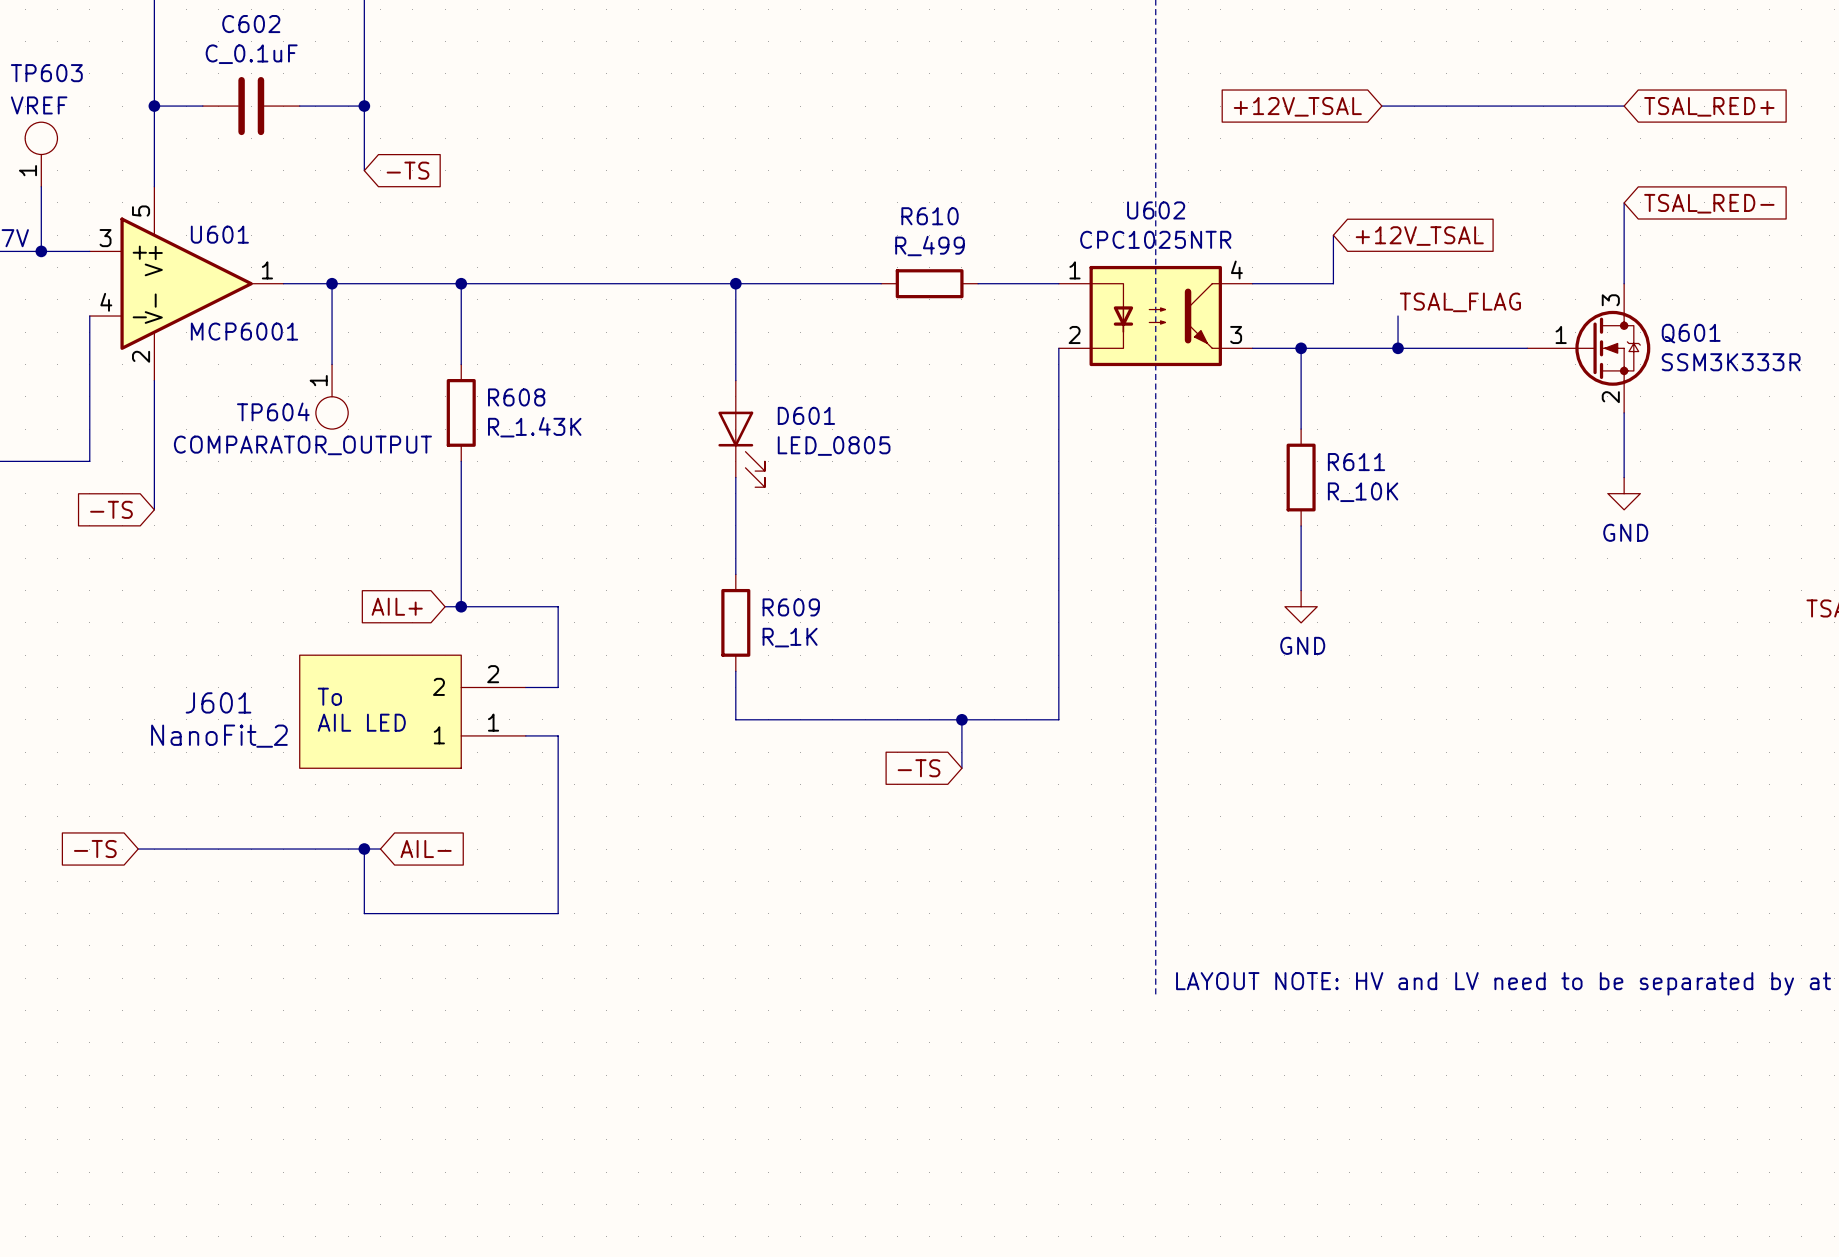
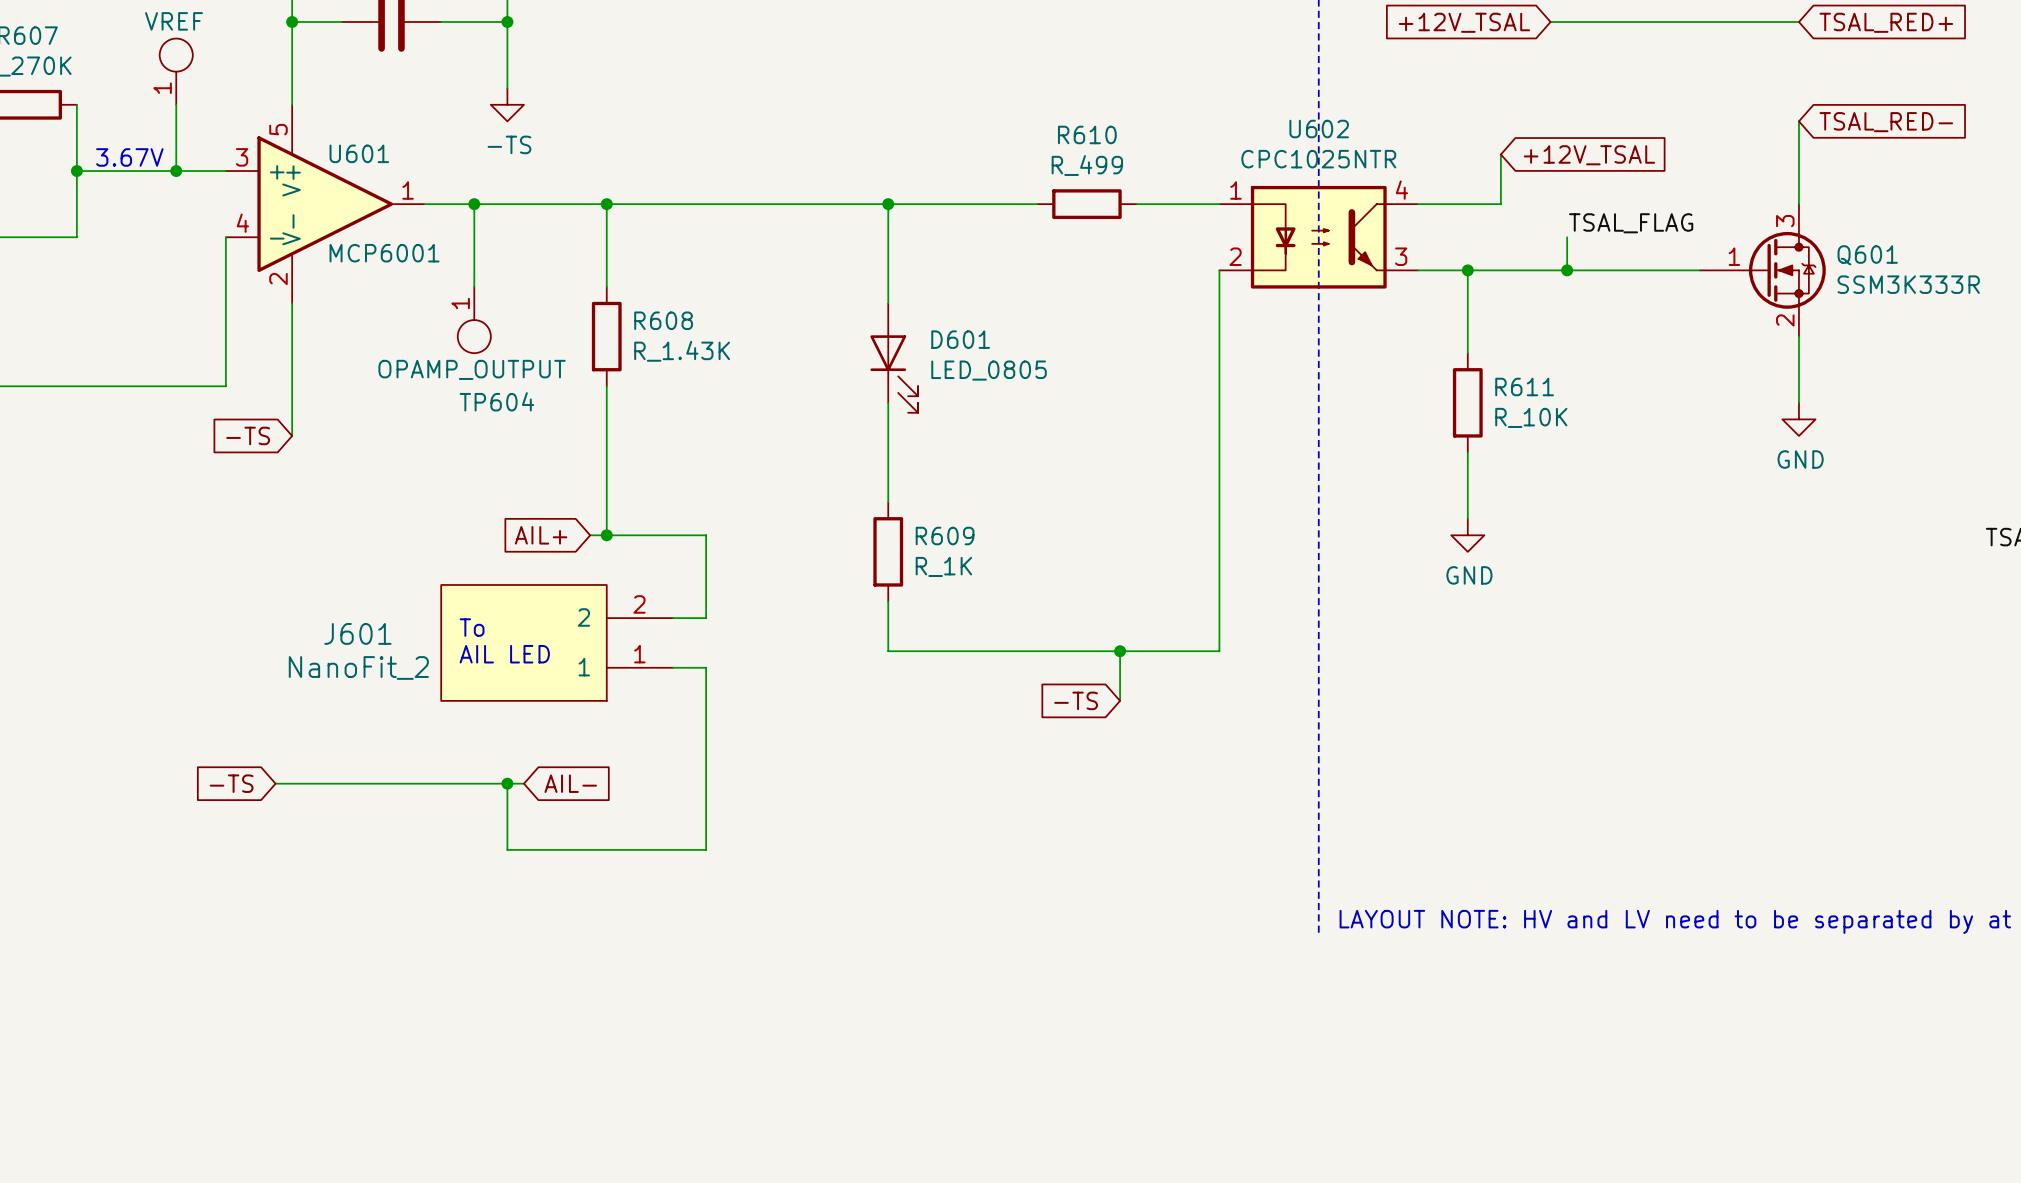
global label: -TS (408, 170) -> none
power symbol: none -> -TS (507, 104)
TP604 name position: TP604 (273, 411) -> TP604 (496, 401)
TP604 value: COMPARATOR_OUTPUT (302, 445) -> OPAMP_OUTPUT (472, 369)

